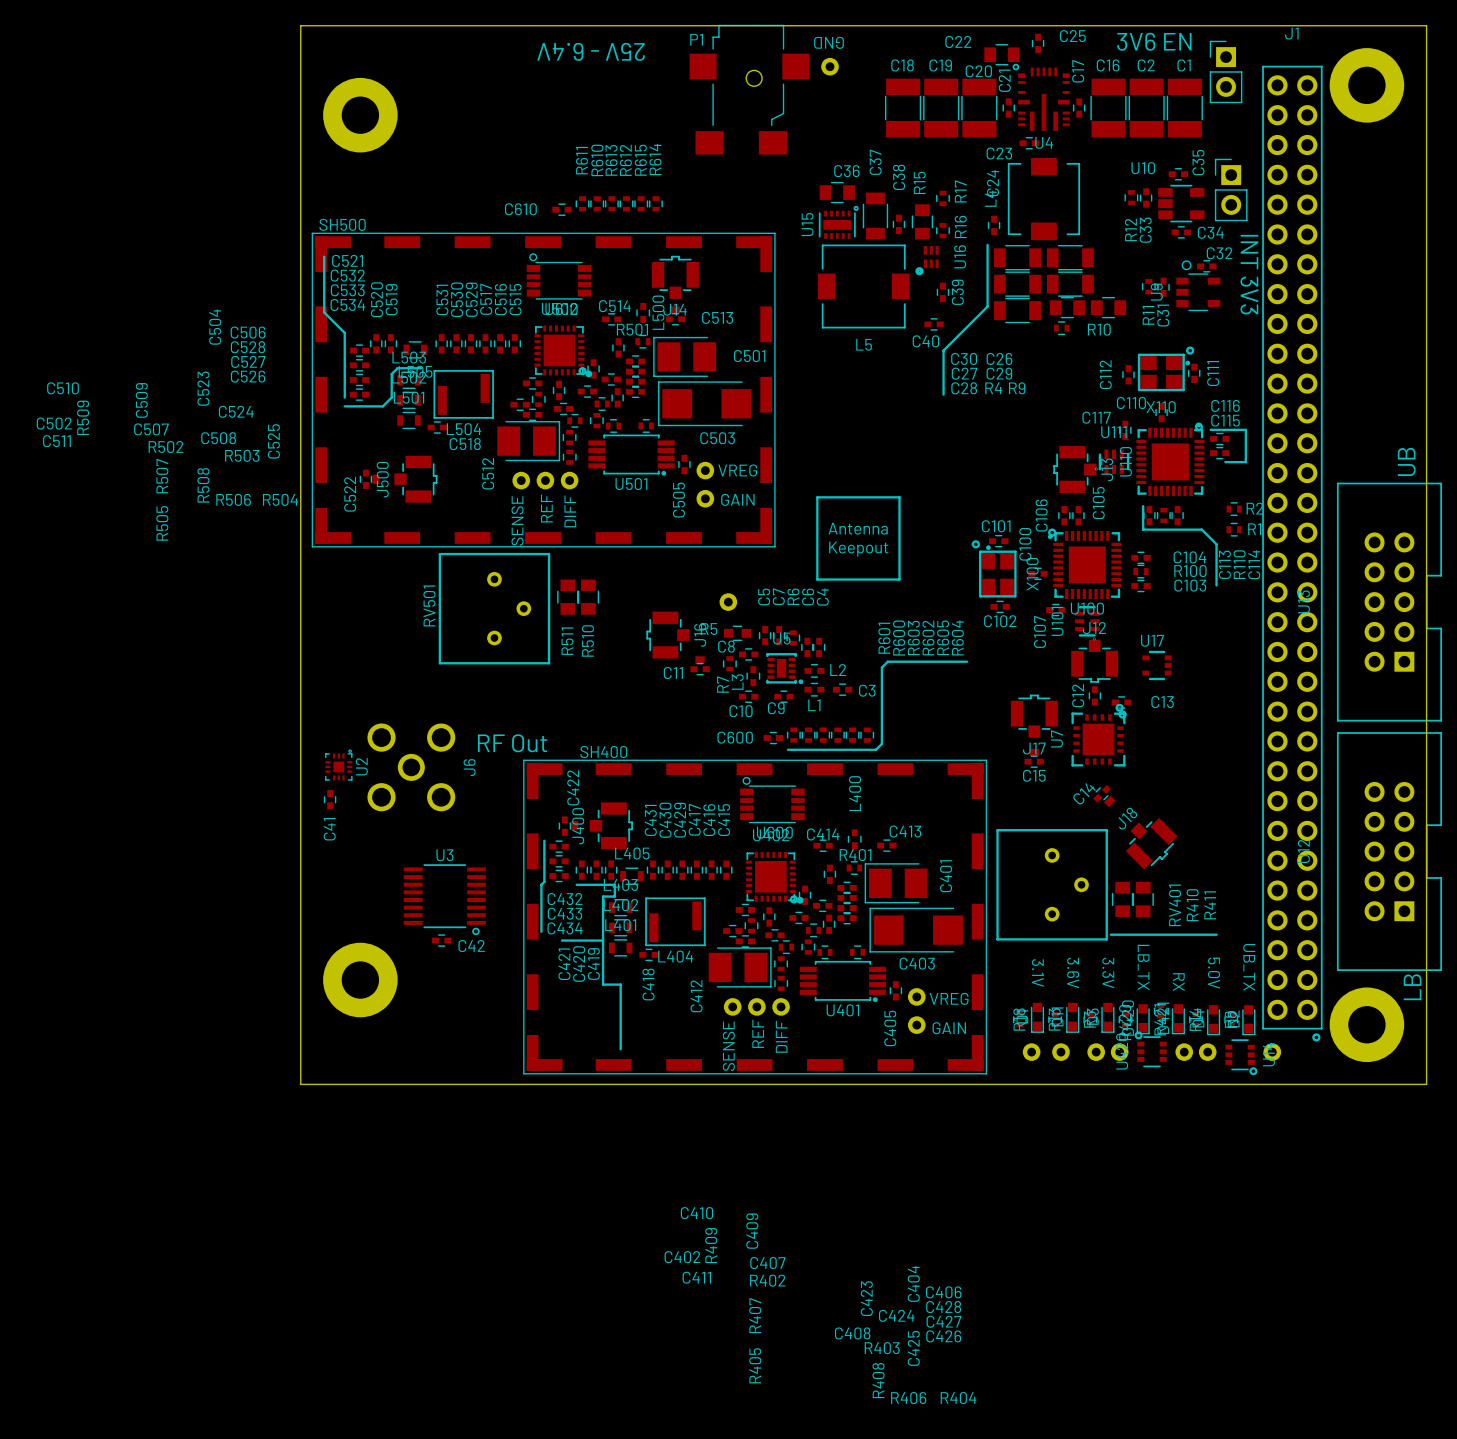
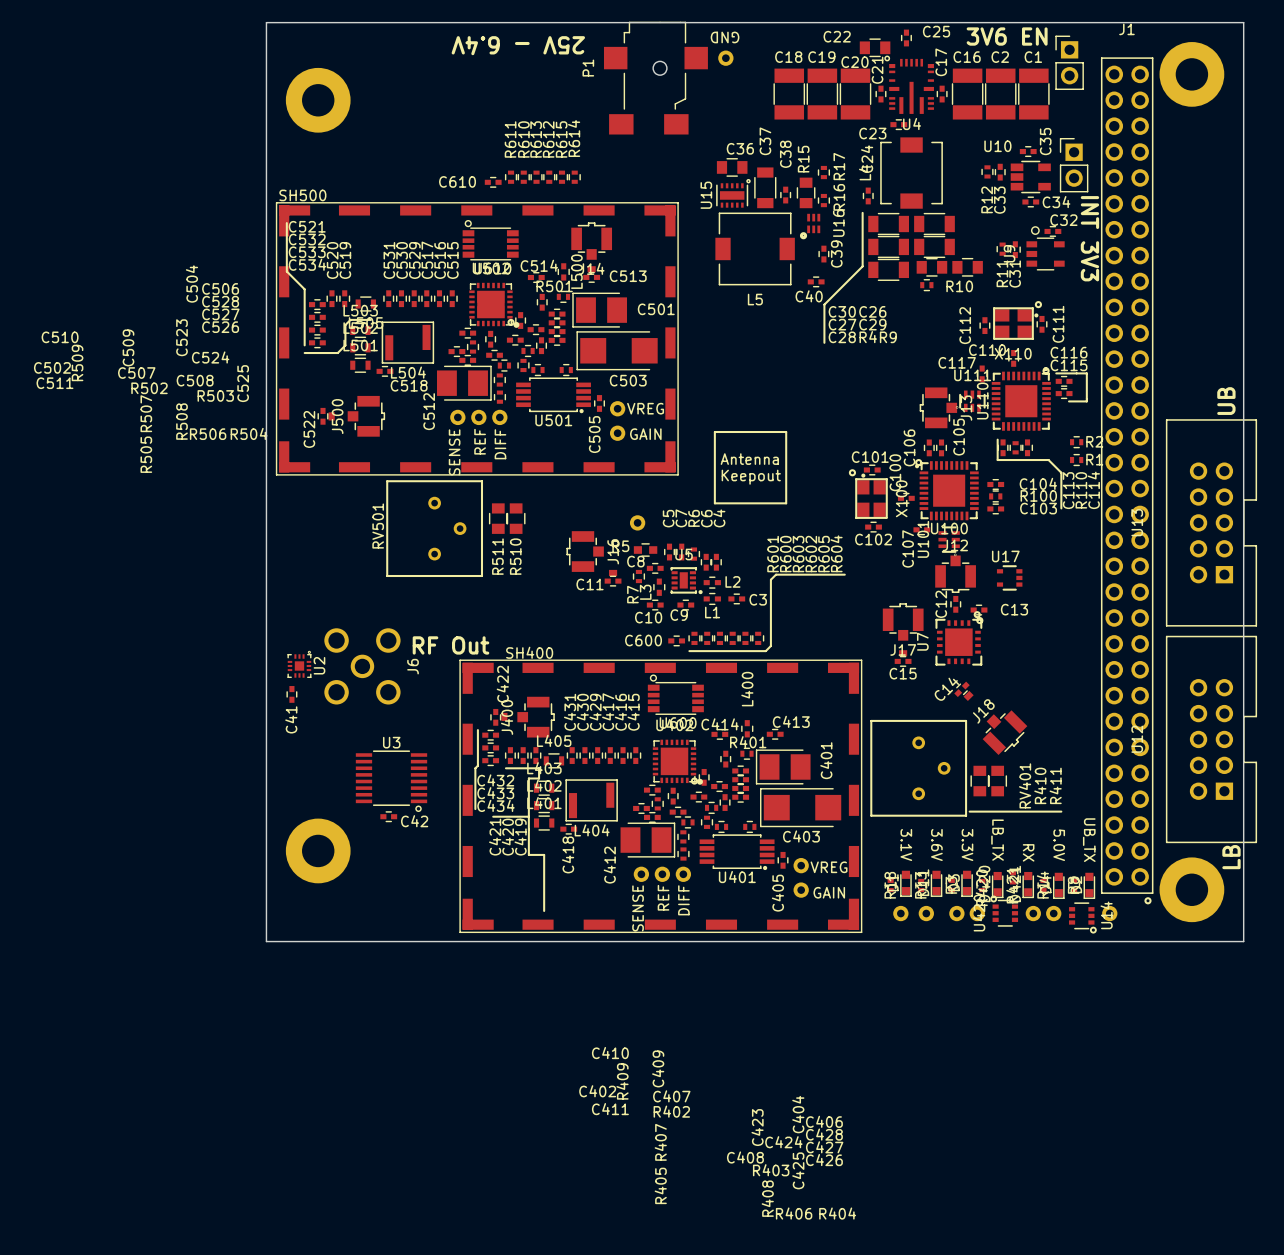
P1 name rotation: 0° (696, 39) -> 90° counterclockwise (588, 68)
P1 name position: P1 (696, 39) -> P1 (588, 68)

